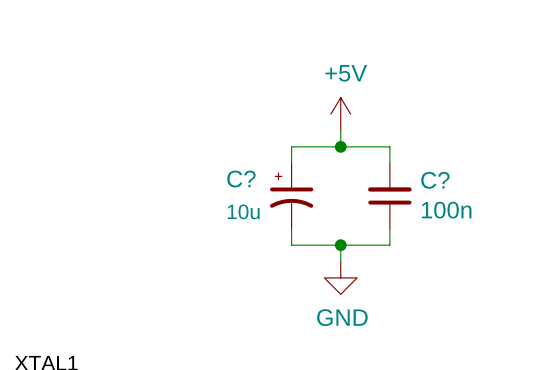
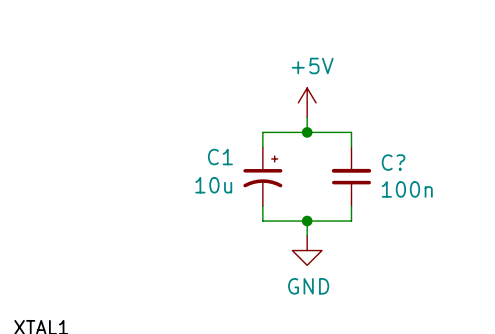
C?: 10u (291, 196) -> none
C1: none -> 10u (262, 176)

